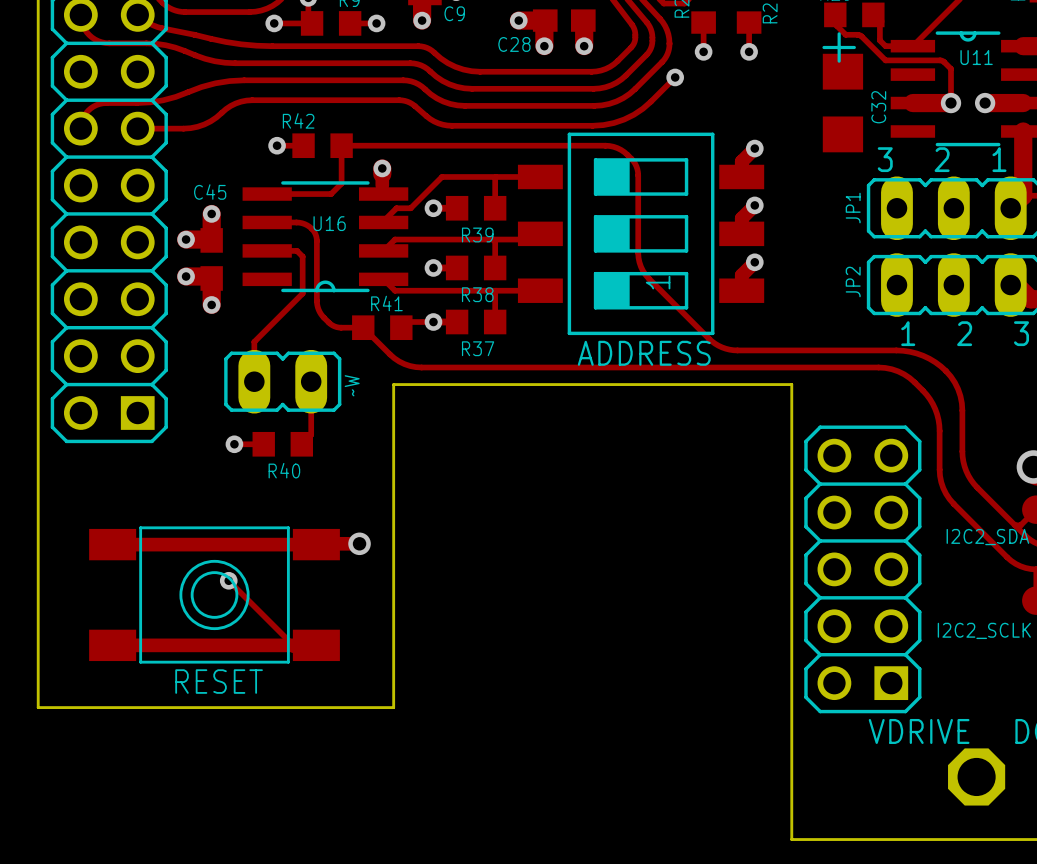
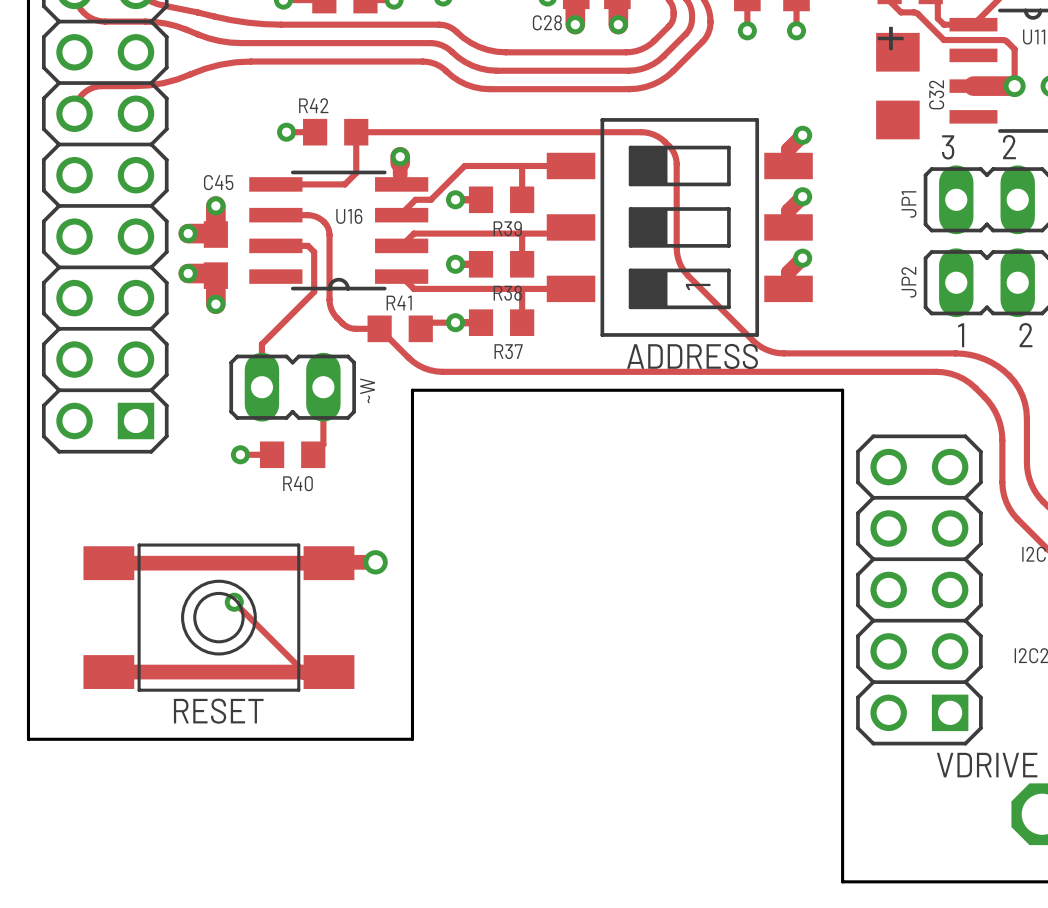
track: (675, 77) (651, 101) (633, 114) (603, 125) (447, 125) (434, 121) (412, 104) (402, 100) (252, 100) (235, 103) (210, 121) (197, 126) (137, 128) -> none
via: (675, 77) -> none

